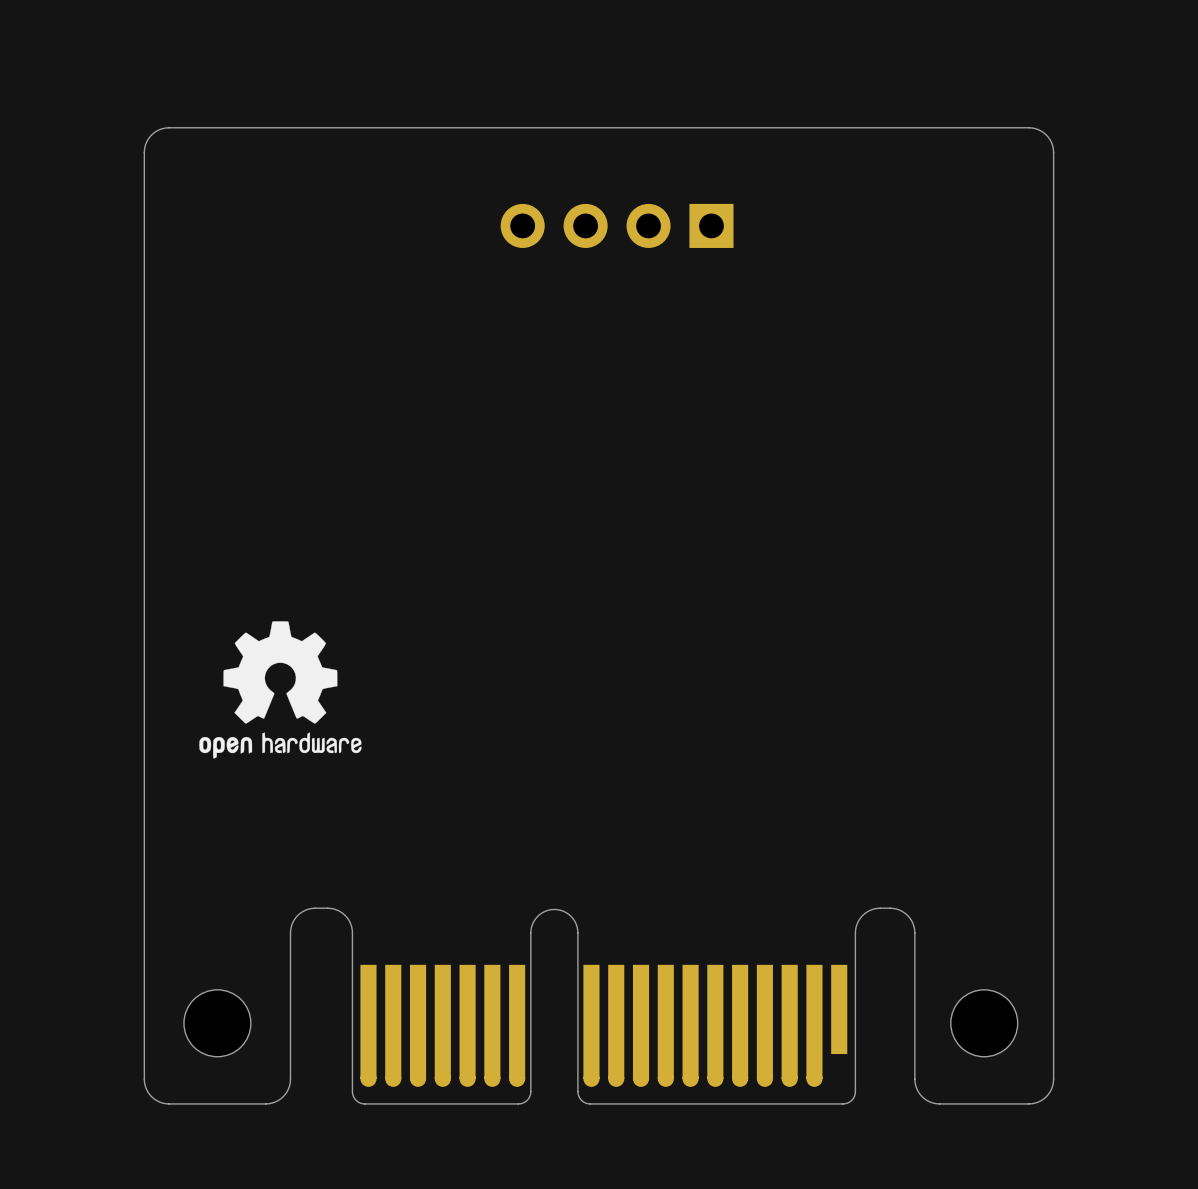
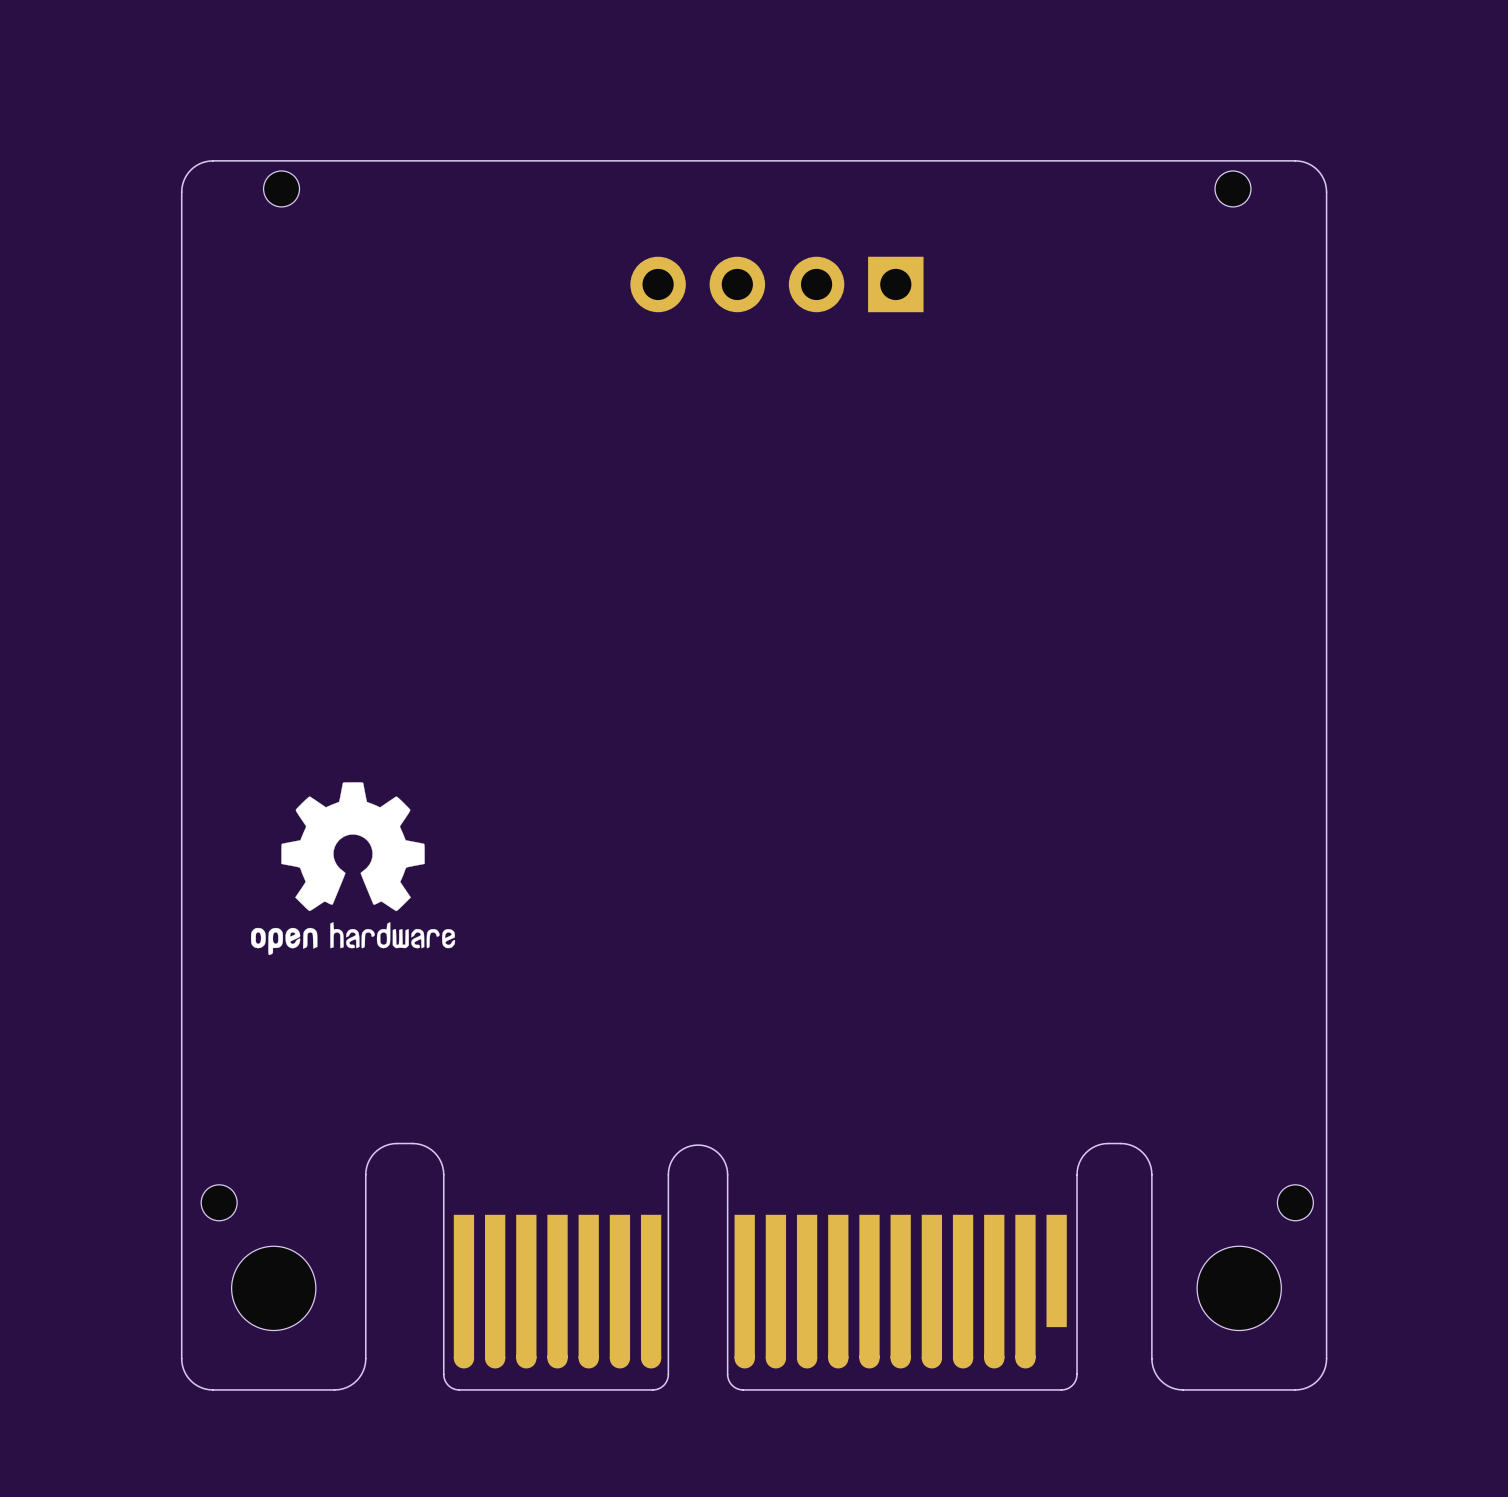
part: none -> (281, 188)
part: none -> (1232, 188)
part: none -> (219, 1202)
part: none -> (1295, 1202)

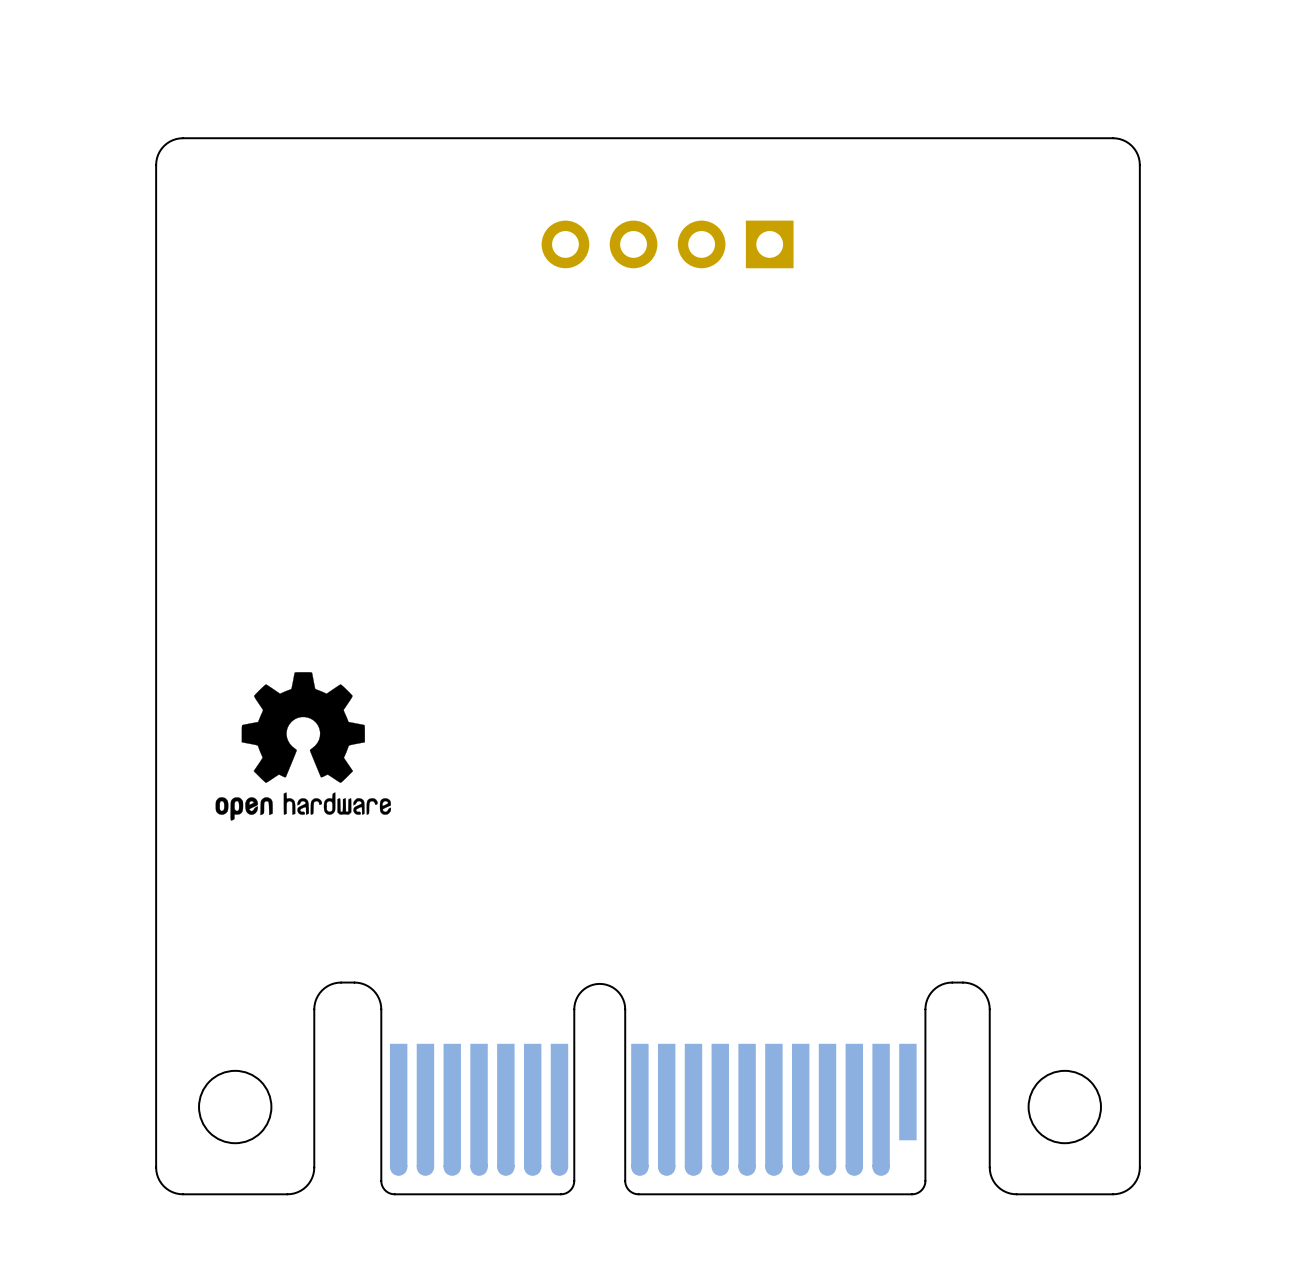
part: (281, 188) -> none
part: (1232, 188) -> none
part: (219, 1202) -> none
part: (1295, 1202) -> none

